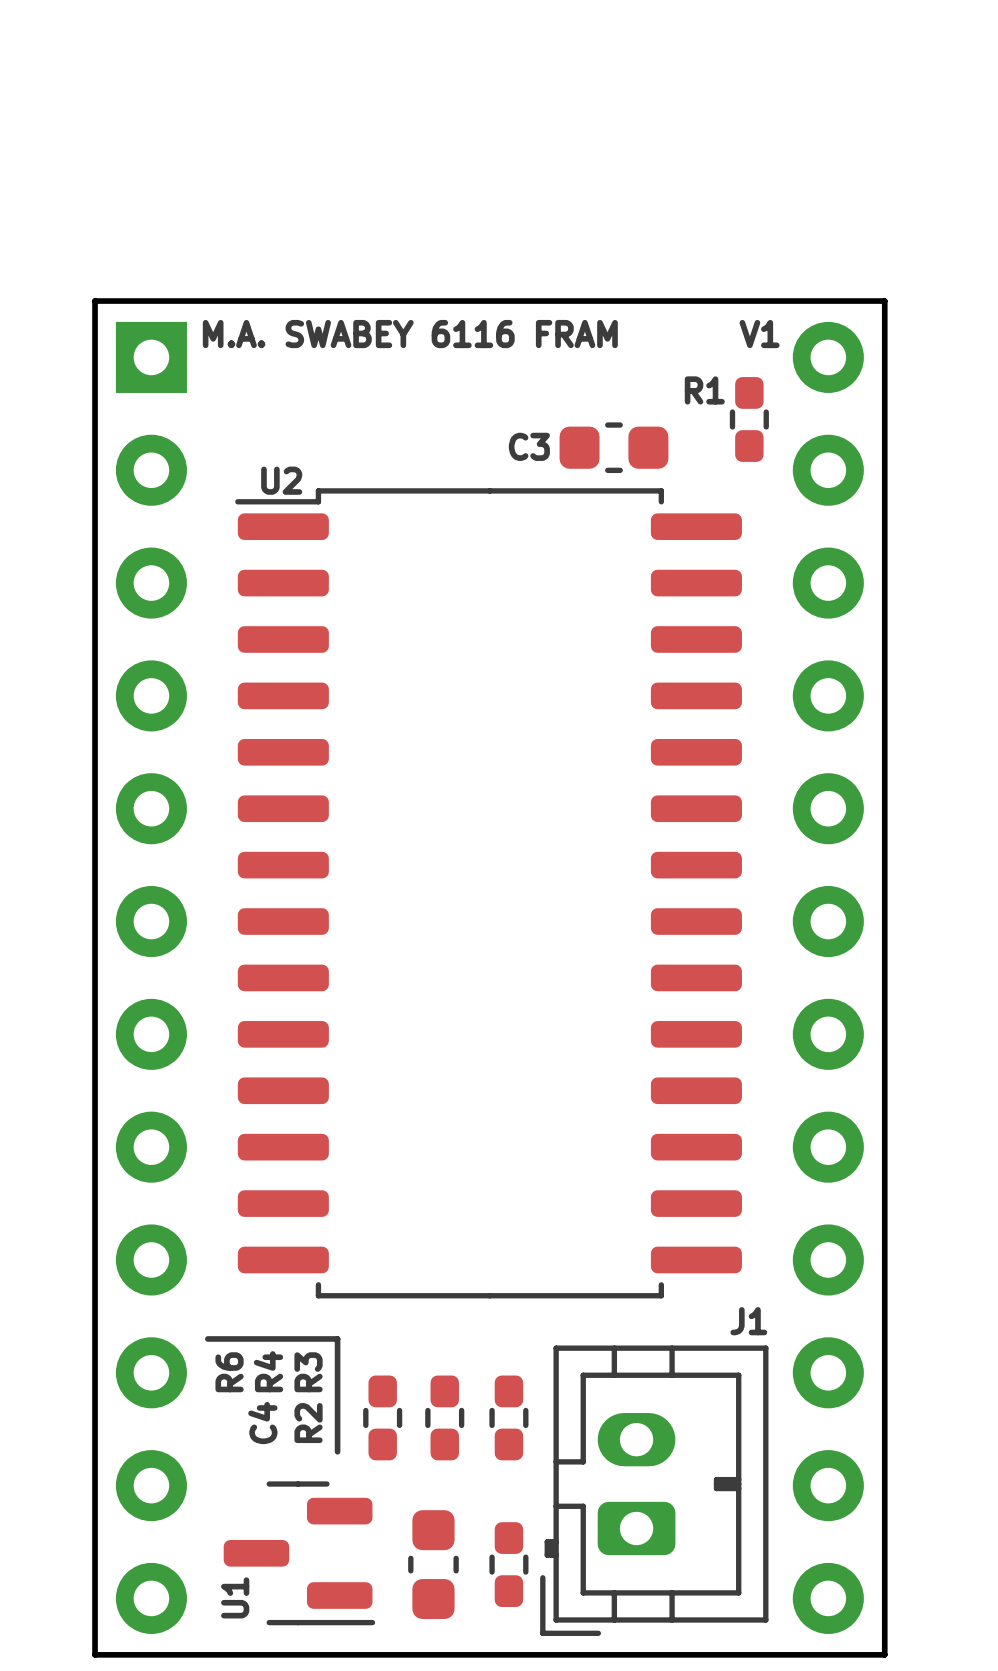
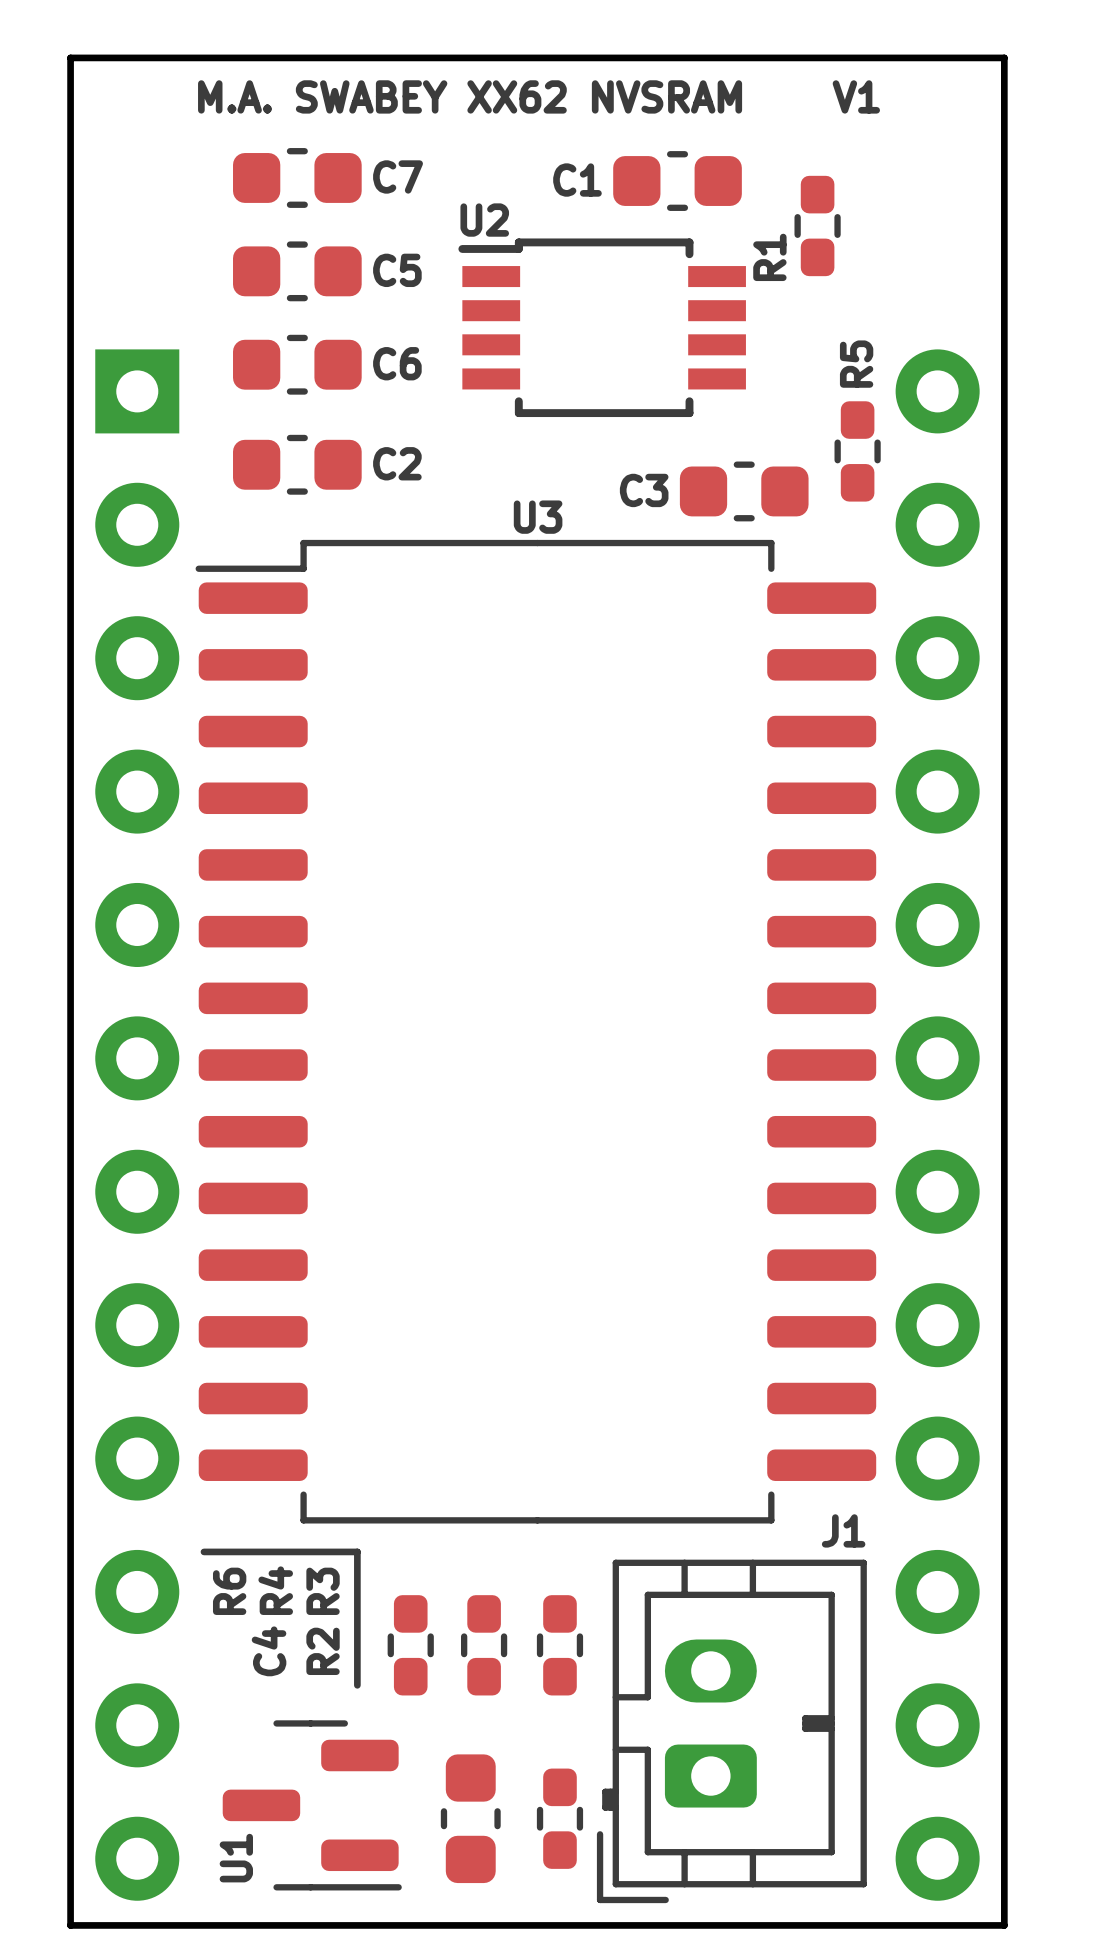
text: none -> M.A. SWABEY XX62 NVSRAM (470, 96)
C7: none -> (297, 177)
C1: none -> (677, 181)
C5: none -> (297, 271)
board edge: (95, 301) (884, 301) -> (70, 324) (70, 57) (1004, 57) (1004, 324)
C6: none -> (297, 364)
text: M.A. SWABEY 6116 FRAM (410, 334) -> none
text position: V1 (759, 334) -> V1 (856, 96)
R1 name rotation: 0° (704, 390) -> 90° counterclockwise (769, 257)
R5: none -> (857, 451)
C2: none -> (297, 464)
R1 position: (749, 419) -> (817, 225)
C3 position: (613, 447) -> (744, 491)
U2 name position: U2 (281, 480) -> U2 (484, 220)
U2 footprint: [235, 488, 742, 1299] -> [458, 238, 746, 418]
U3: none -> (535, 1031)

